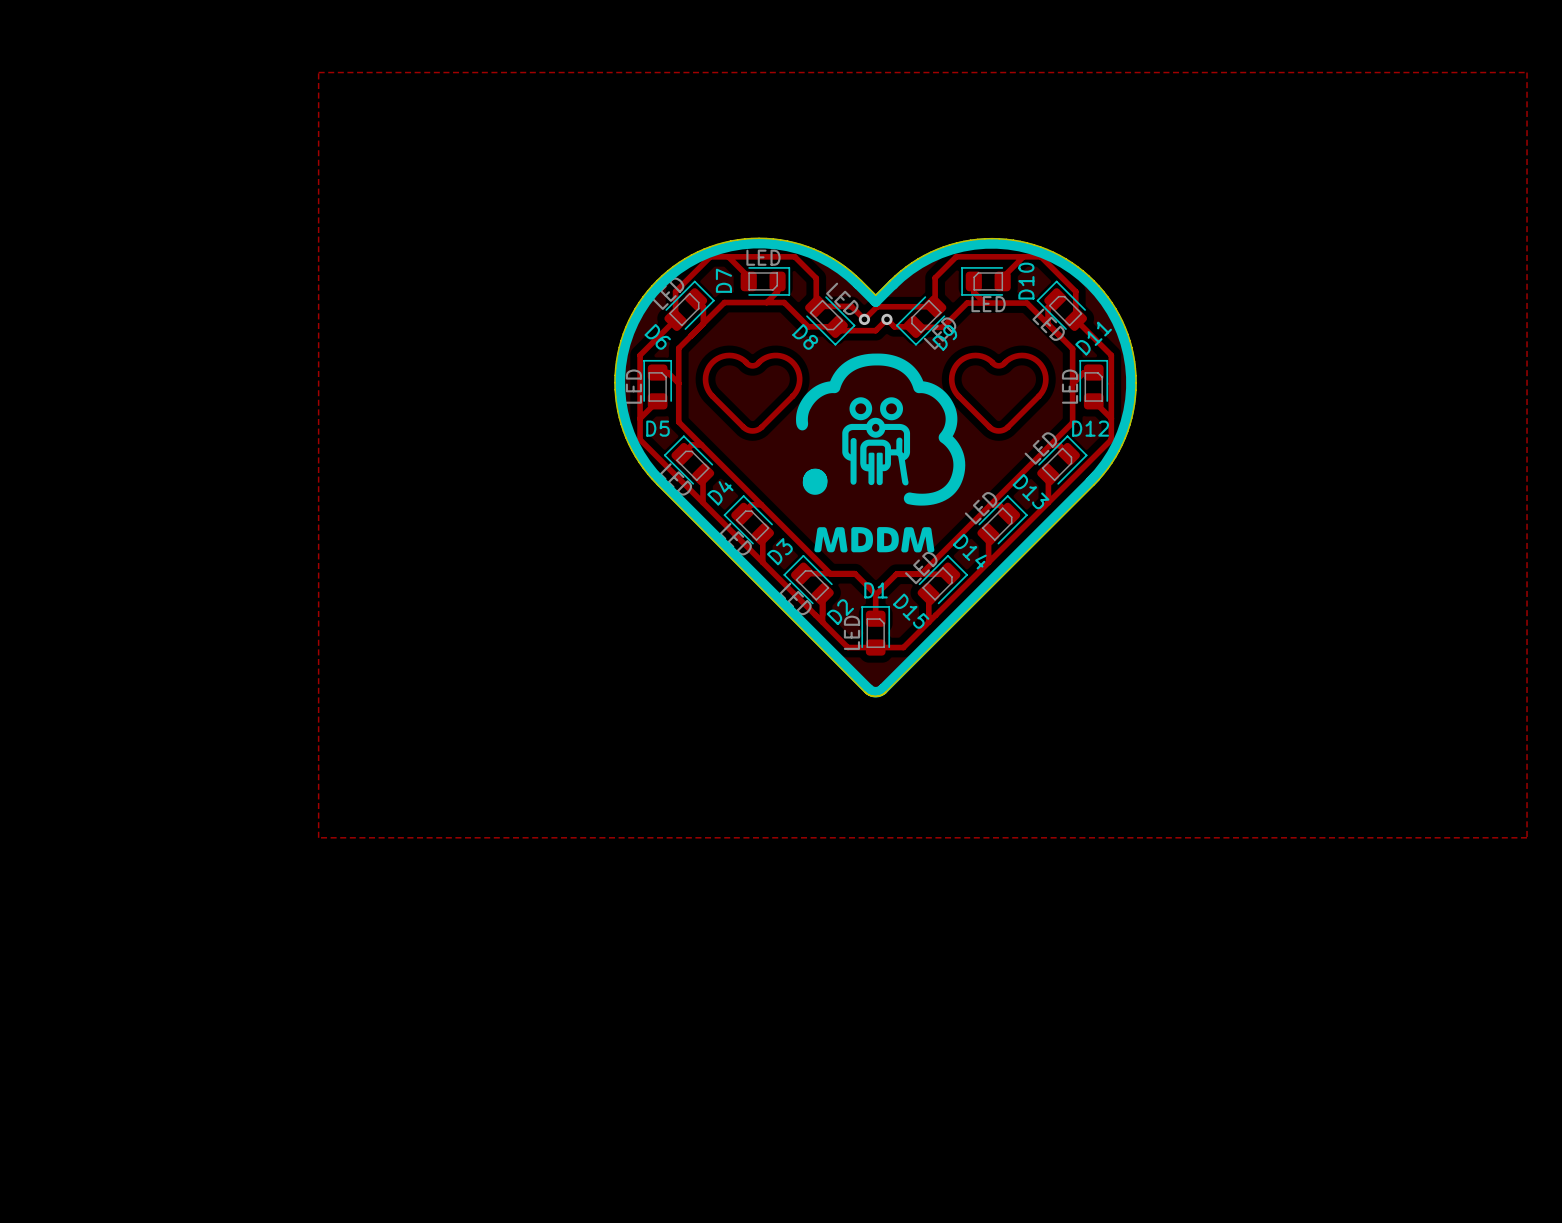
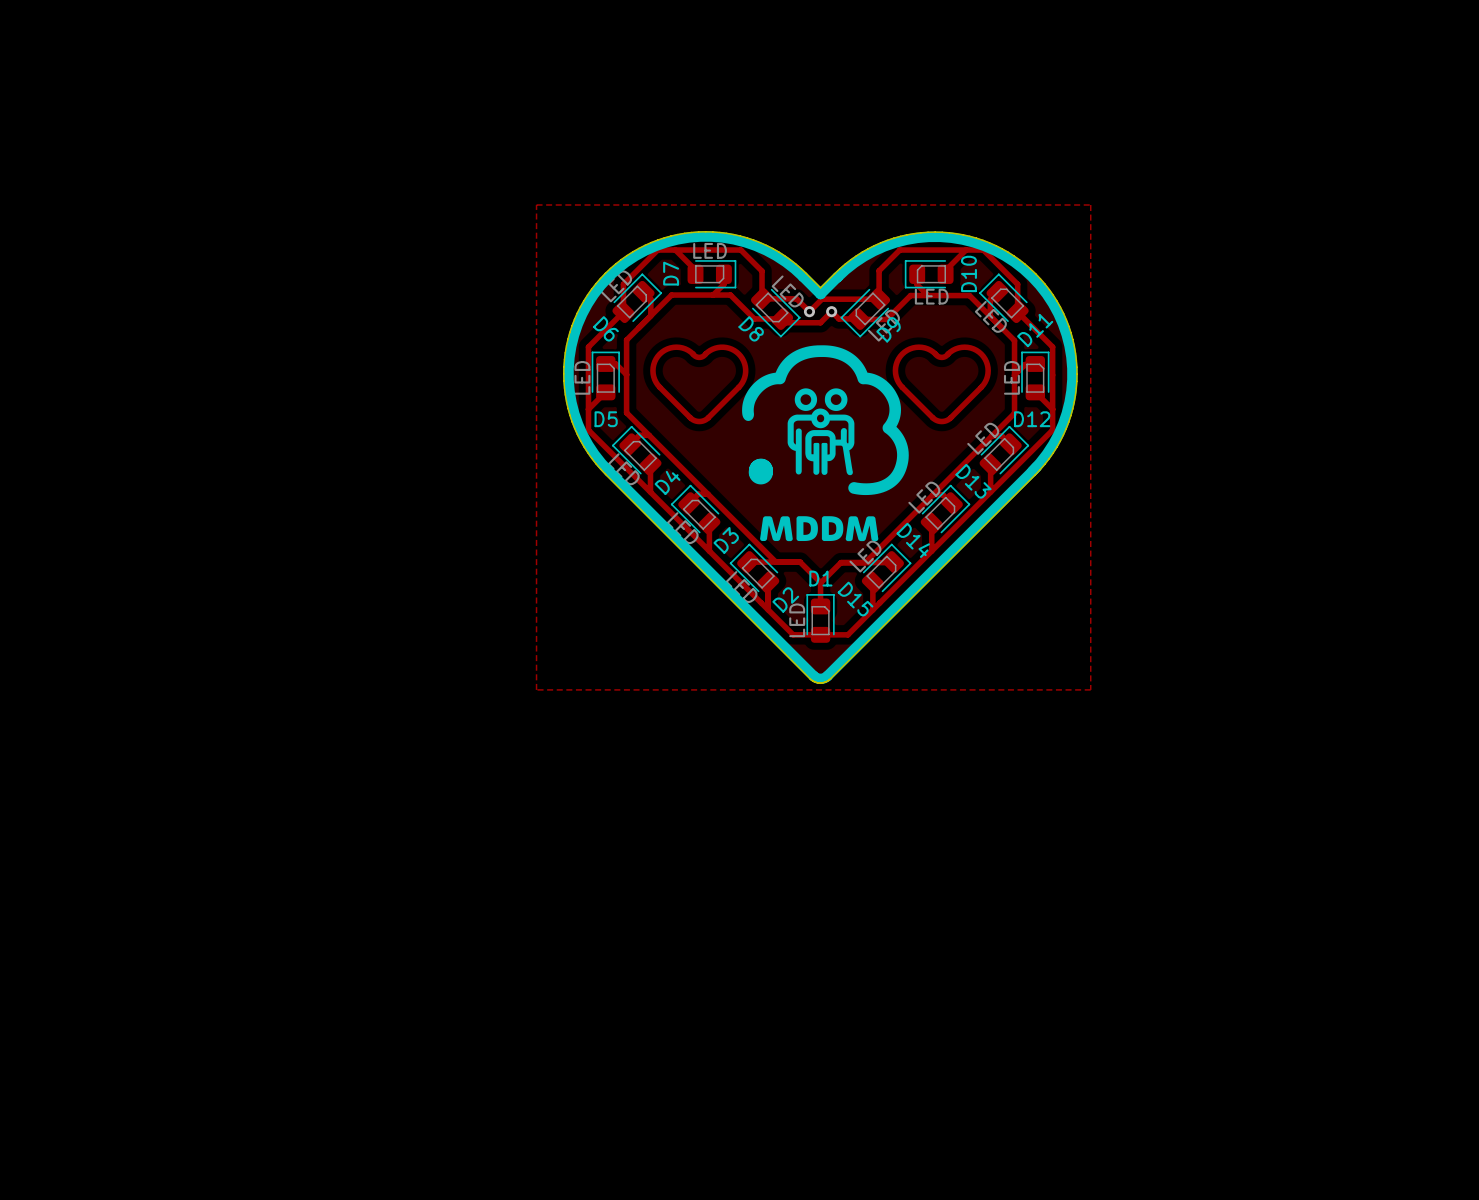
zone outline: (318, 72) (1527, 72) (1527, 837) (318, 837) (318, 72) -> none
zone outline: none -> (536, 204) (1090, 204) (1090, 689) (536, 689) (536, 204)

